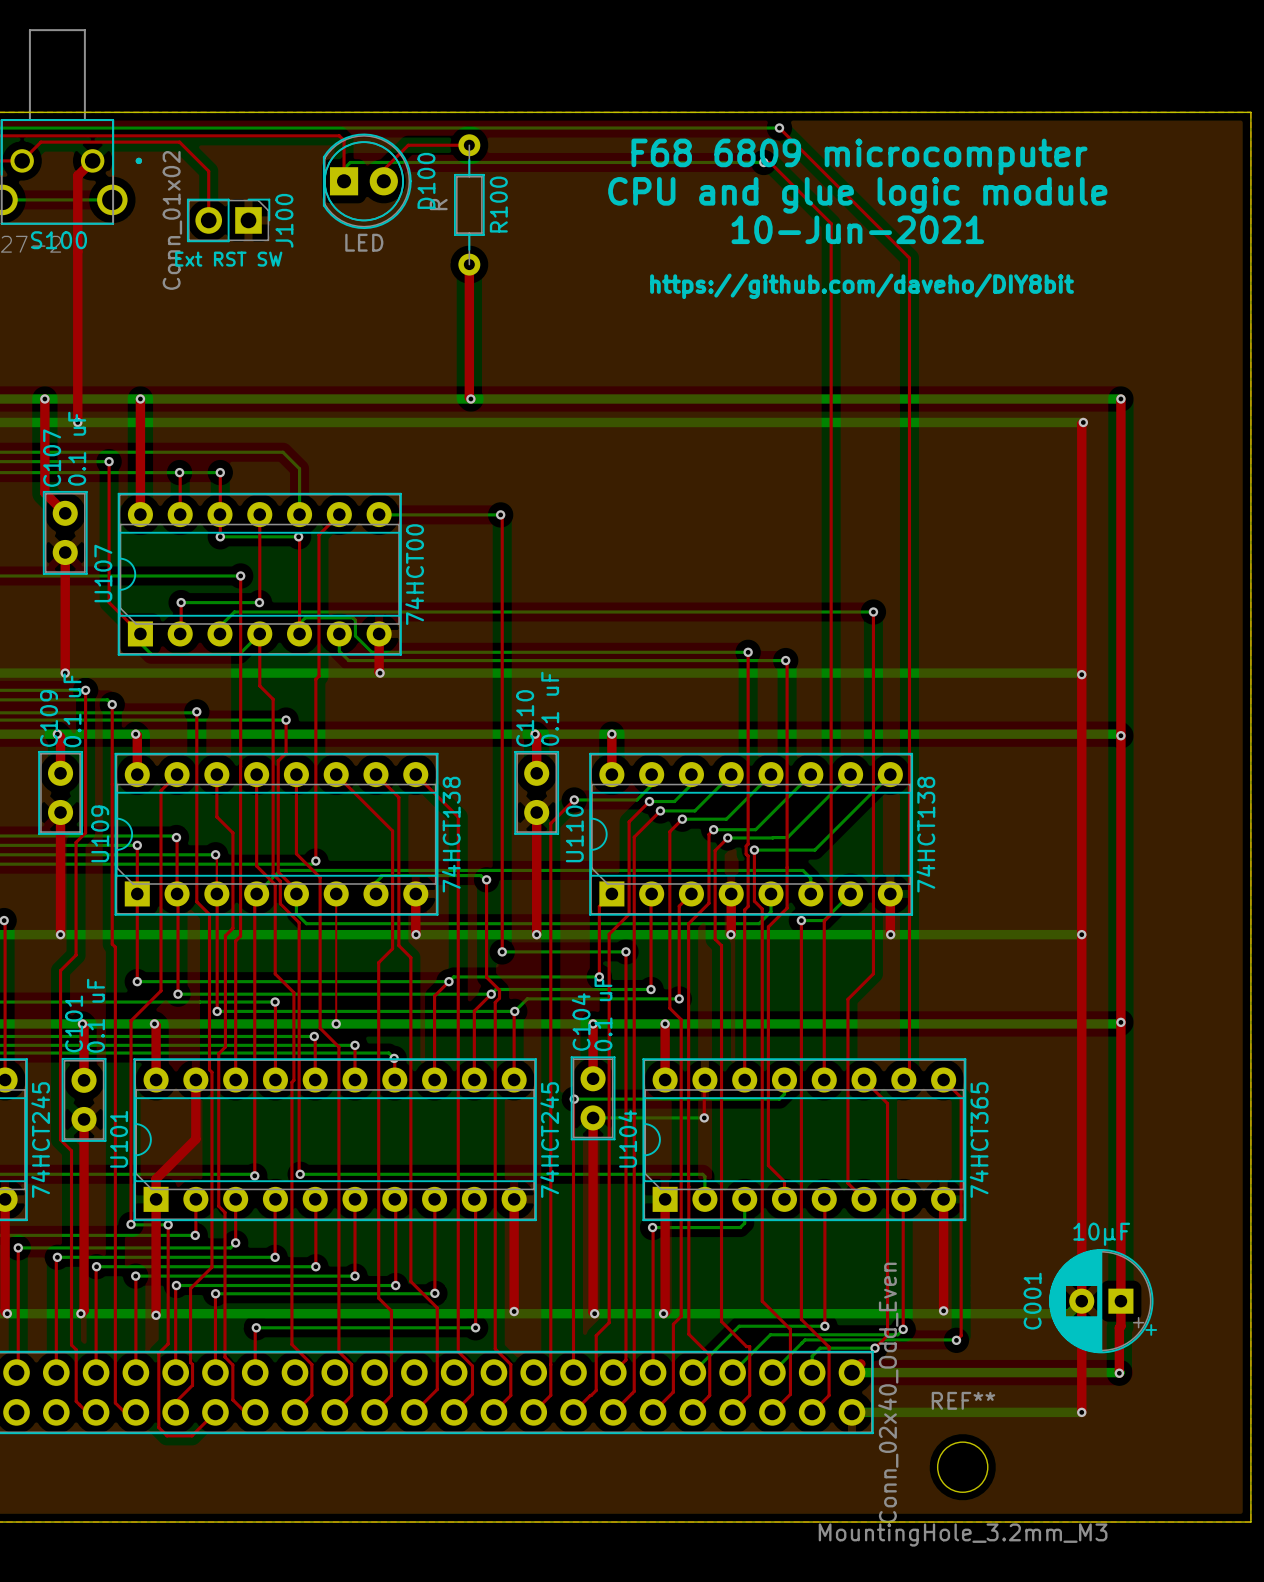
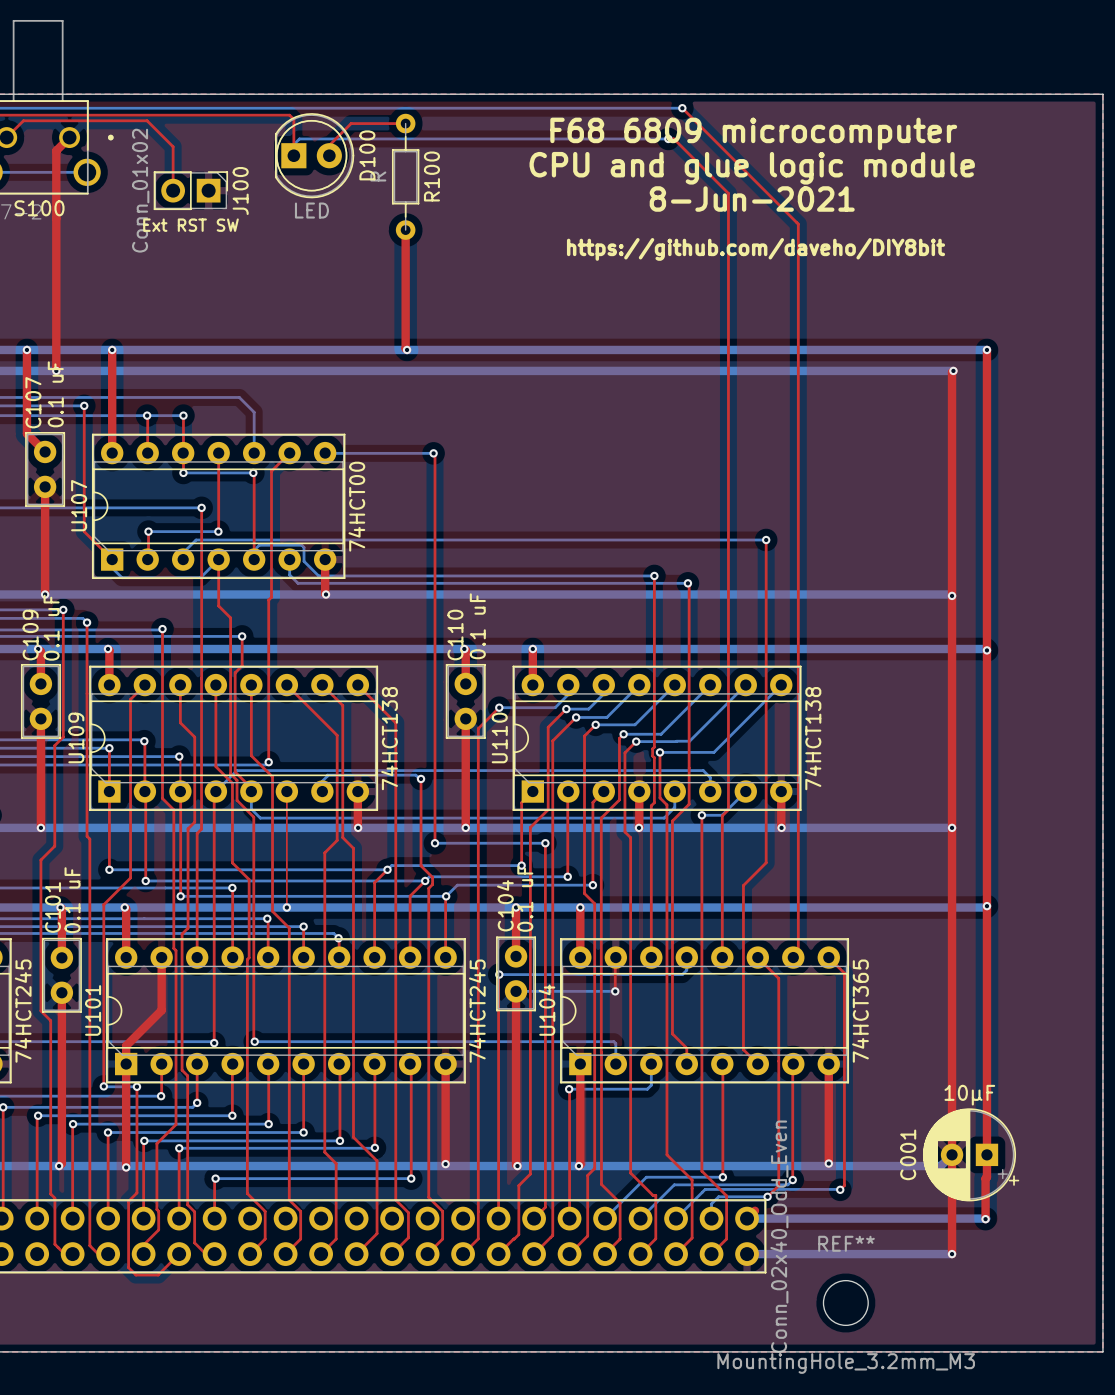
text: 10-Jun-2021 (857, 229) -> 8-Jun-2021 (752, 198)

